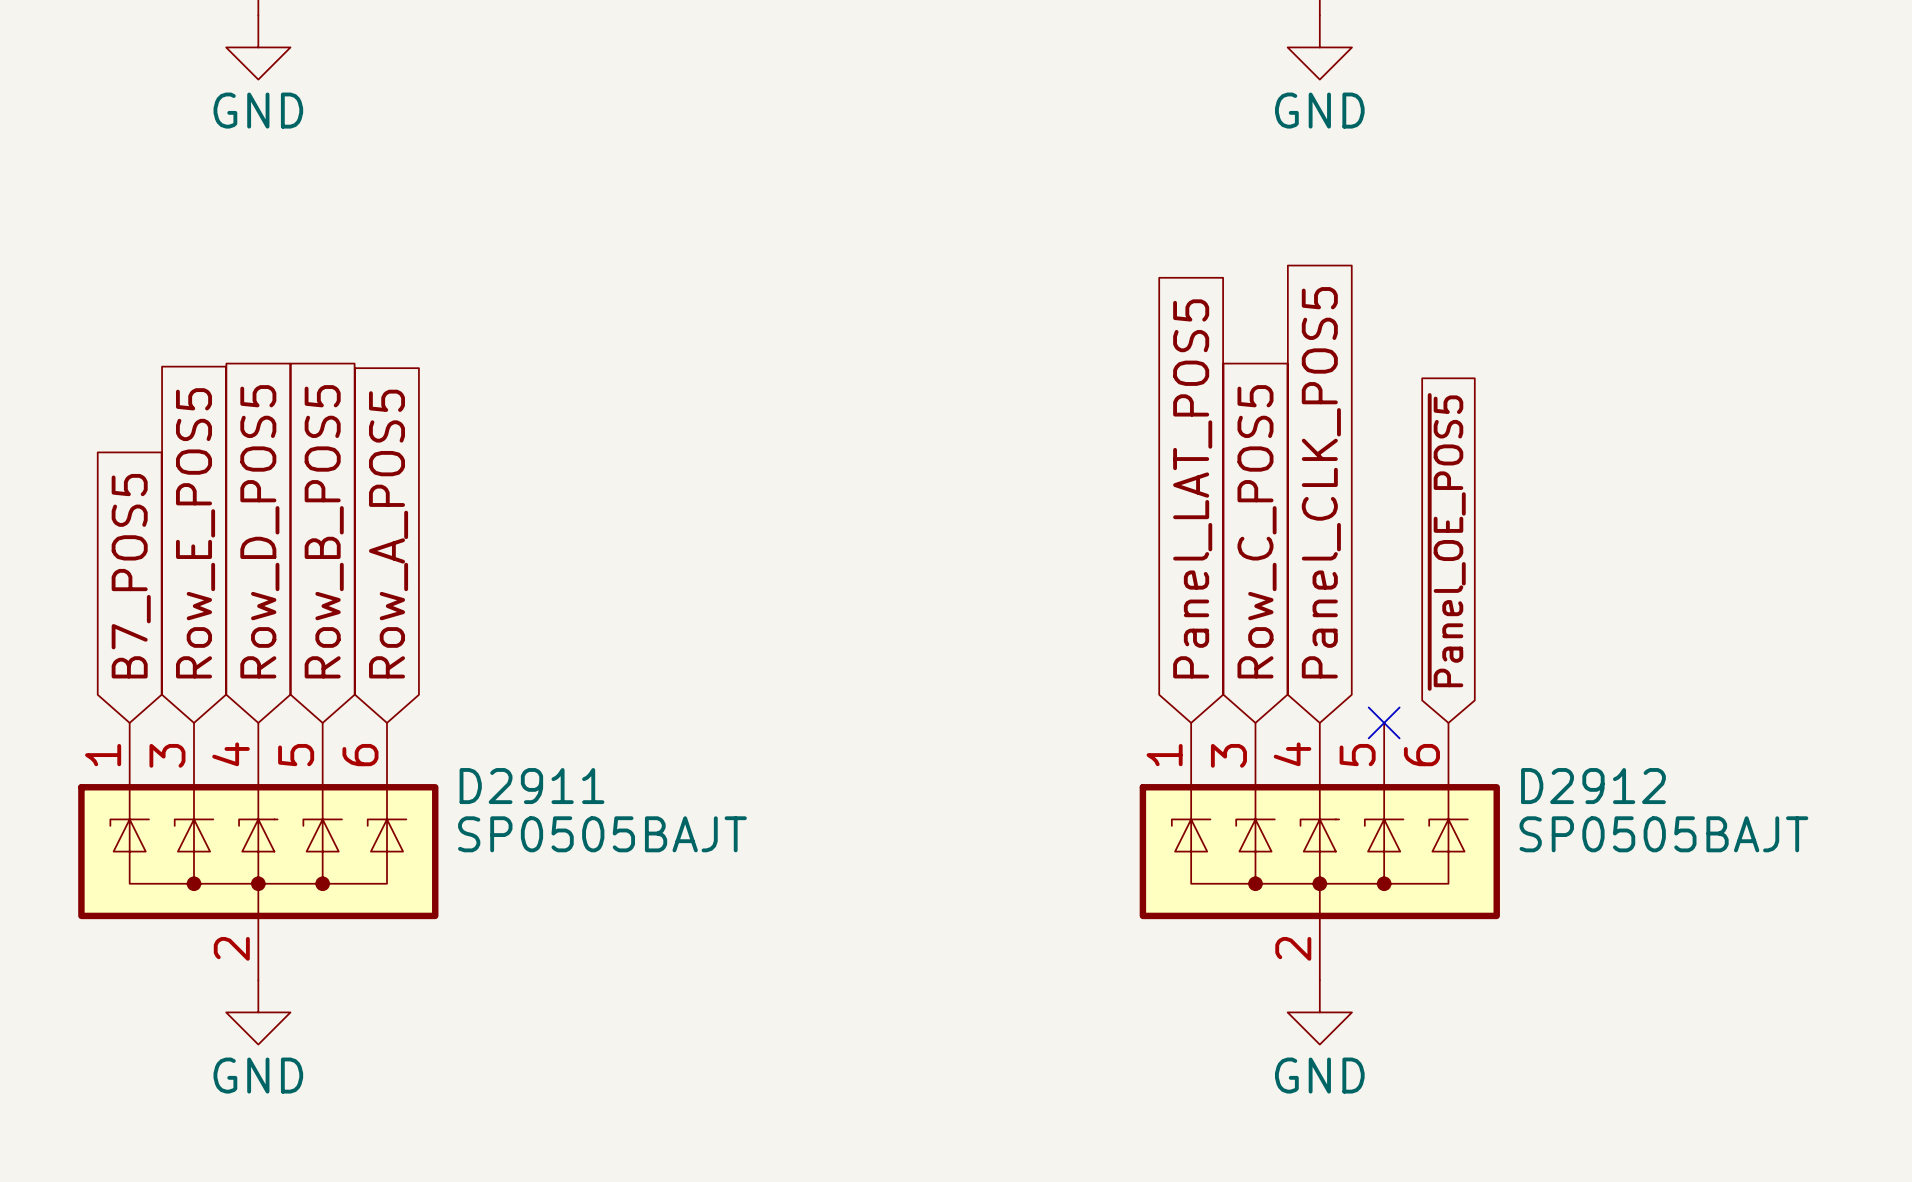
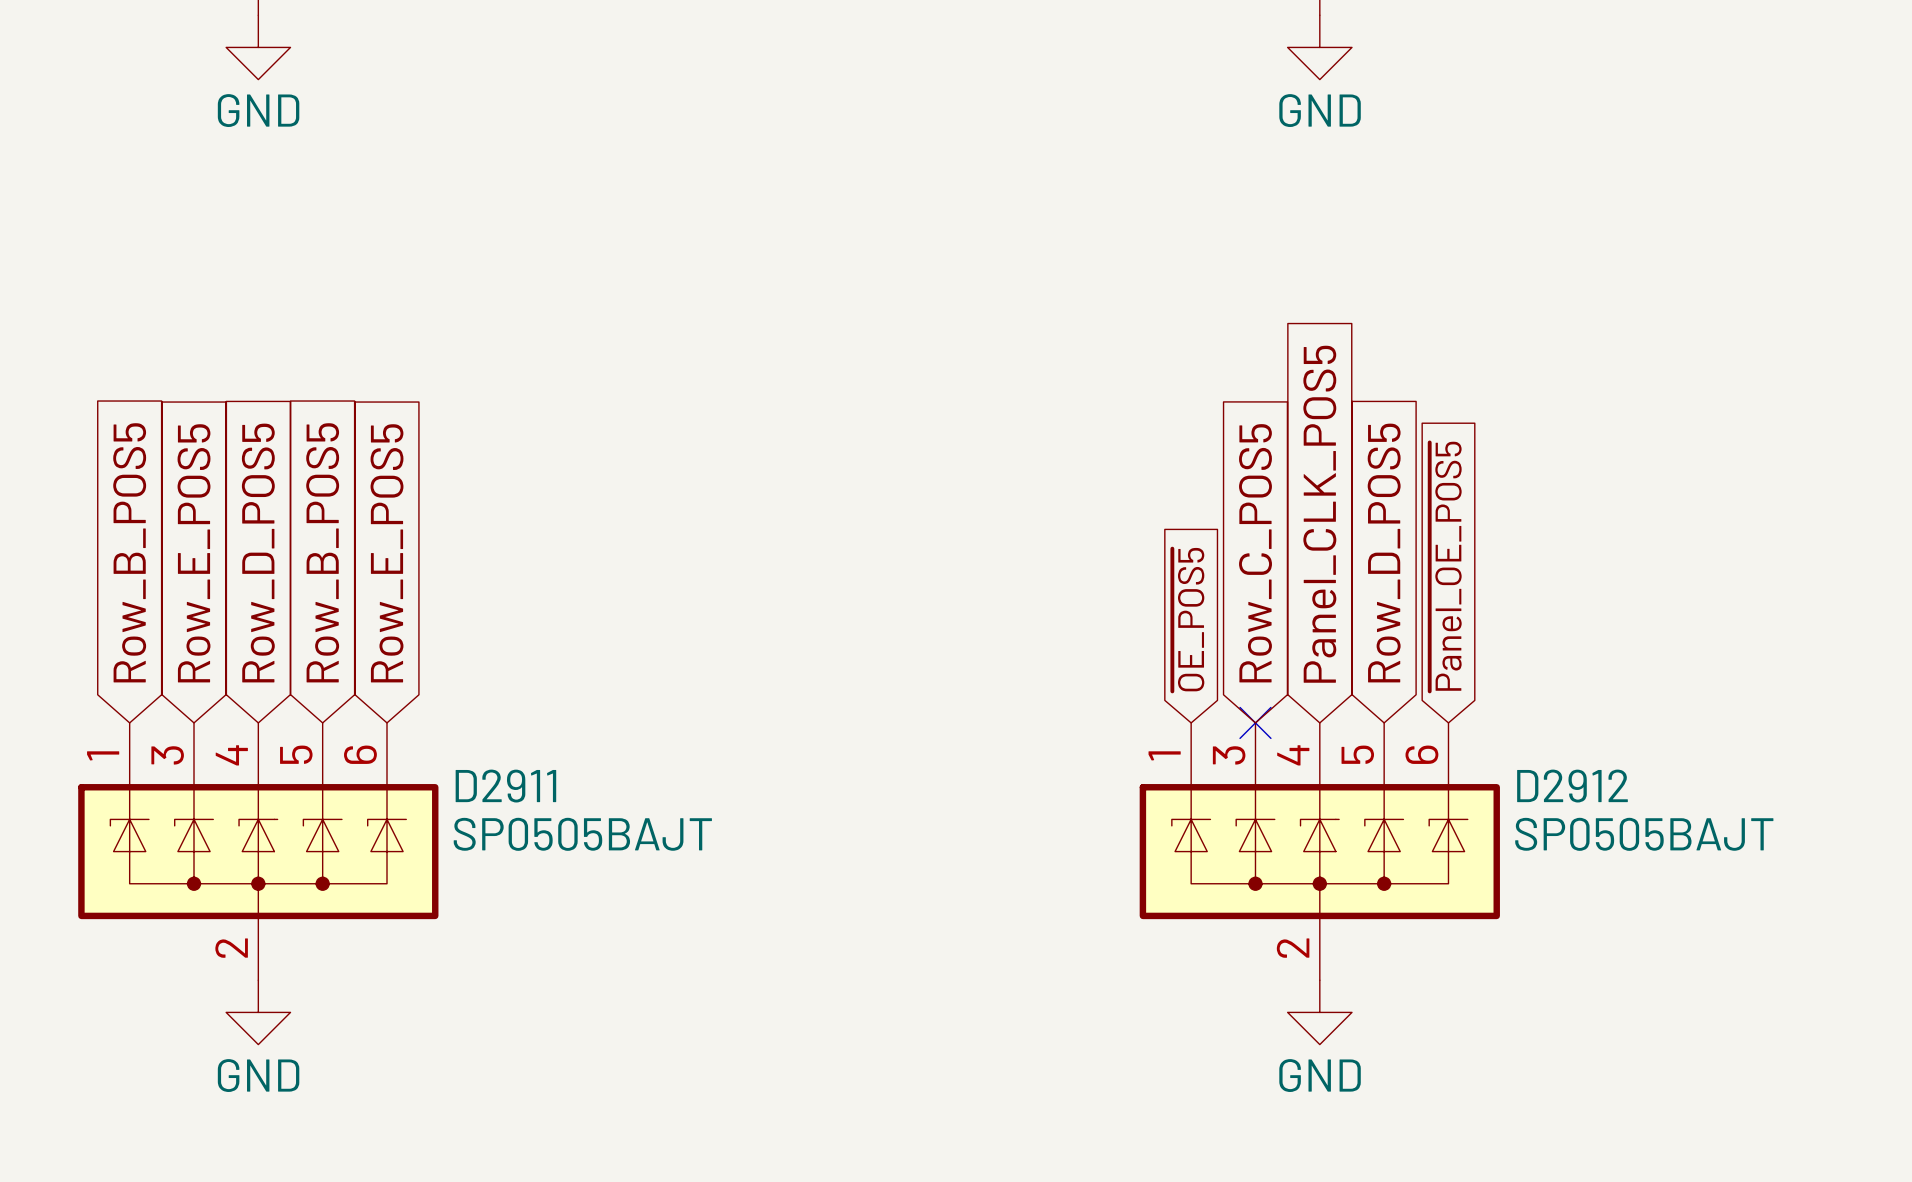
global label: Panel_LAT_POS5 (1192, 488) -> ~{OE_POS5} (1188, 619)
global label: none -> Row_D_POS5 (1384, 553)
global label: Row_A_POS5 (388, 534) -> Row_E_POS5 (387, 553)
global label: B7_POS5 (131, 576) -> Row_B_POS5 (129, 552)
no-connect mark position: (1384, 722) -> (1255, 722)

